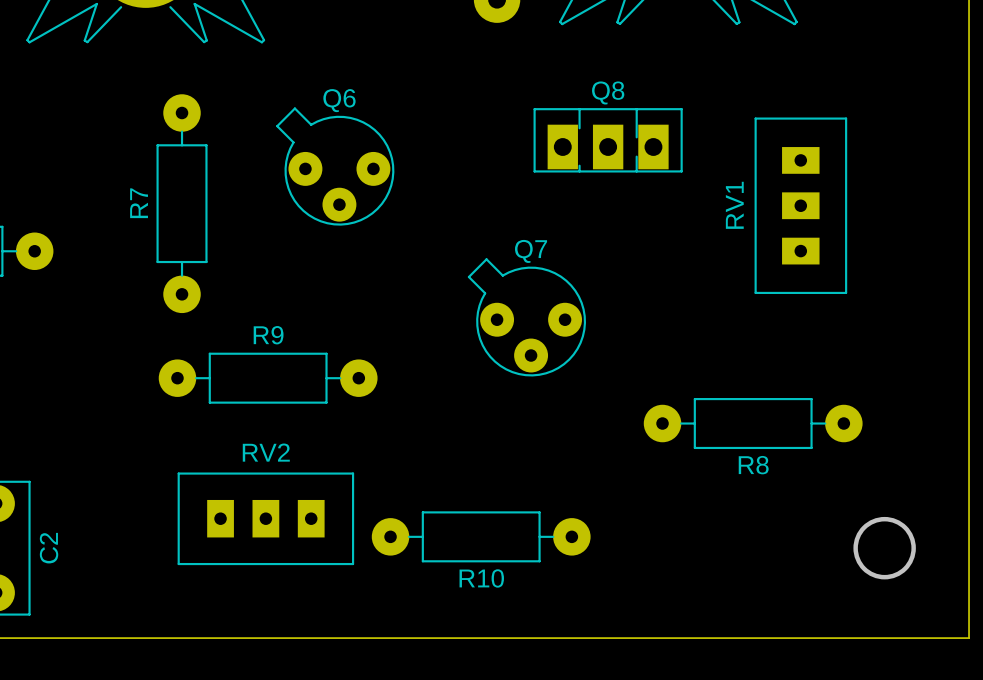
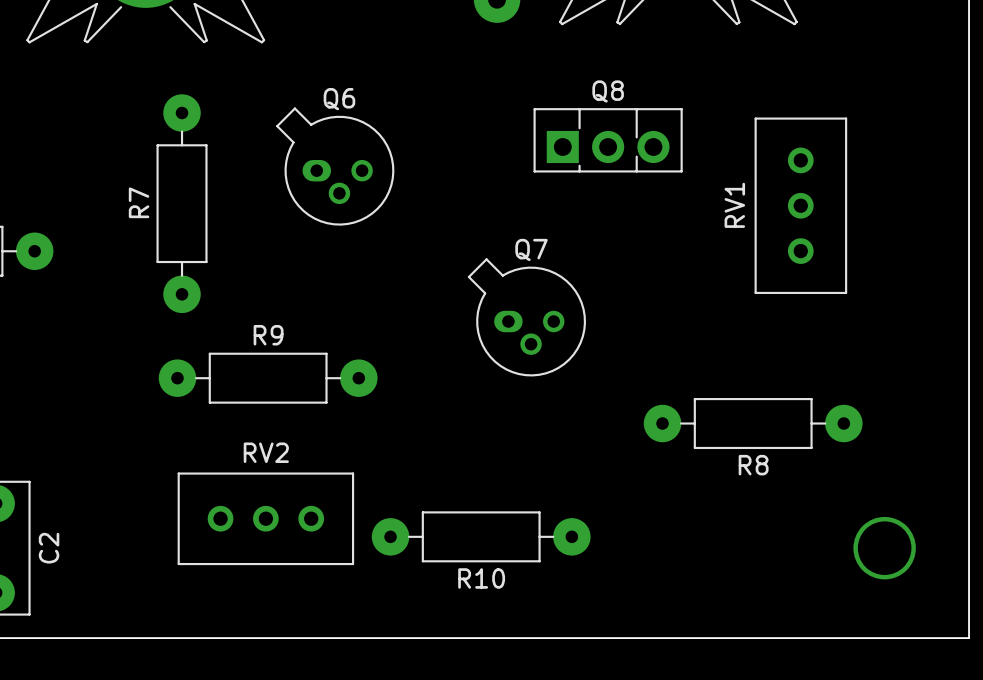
Q6 footprint: [276, 107, 395, 226] -> [276, 107, 395, 226]
Q8 footprint: [533, 108, 683, 173] -> [533, 108, 683, 173]
RV1 footprint: [754, 117, 848, 295] -> [754, 117, 848, 295]
Q7 footprint: [467, 258, 587, 377] -> [467, 258, 587, 377]
RV2 footprint: [177, 472, 355, 566] -> [177, 472, 355, 566]

